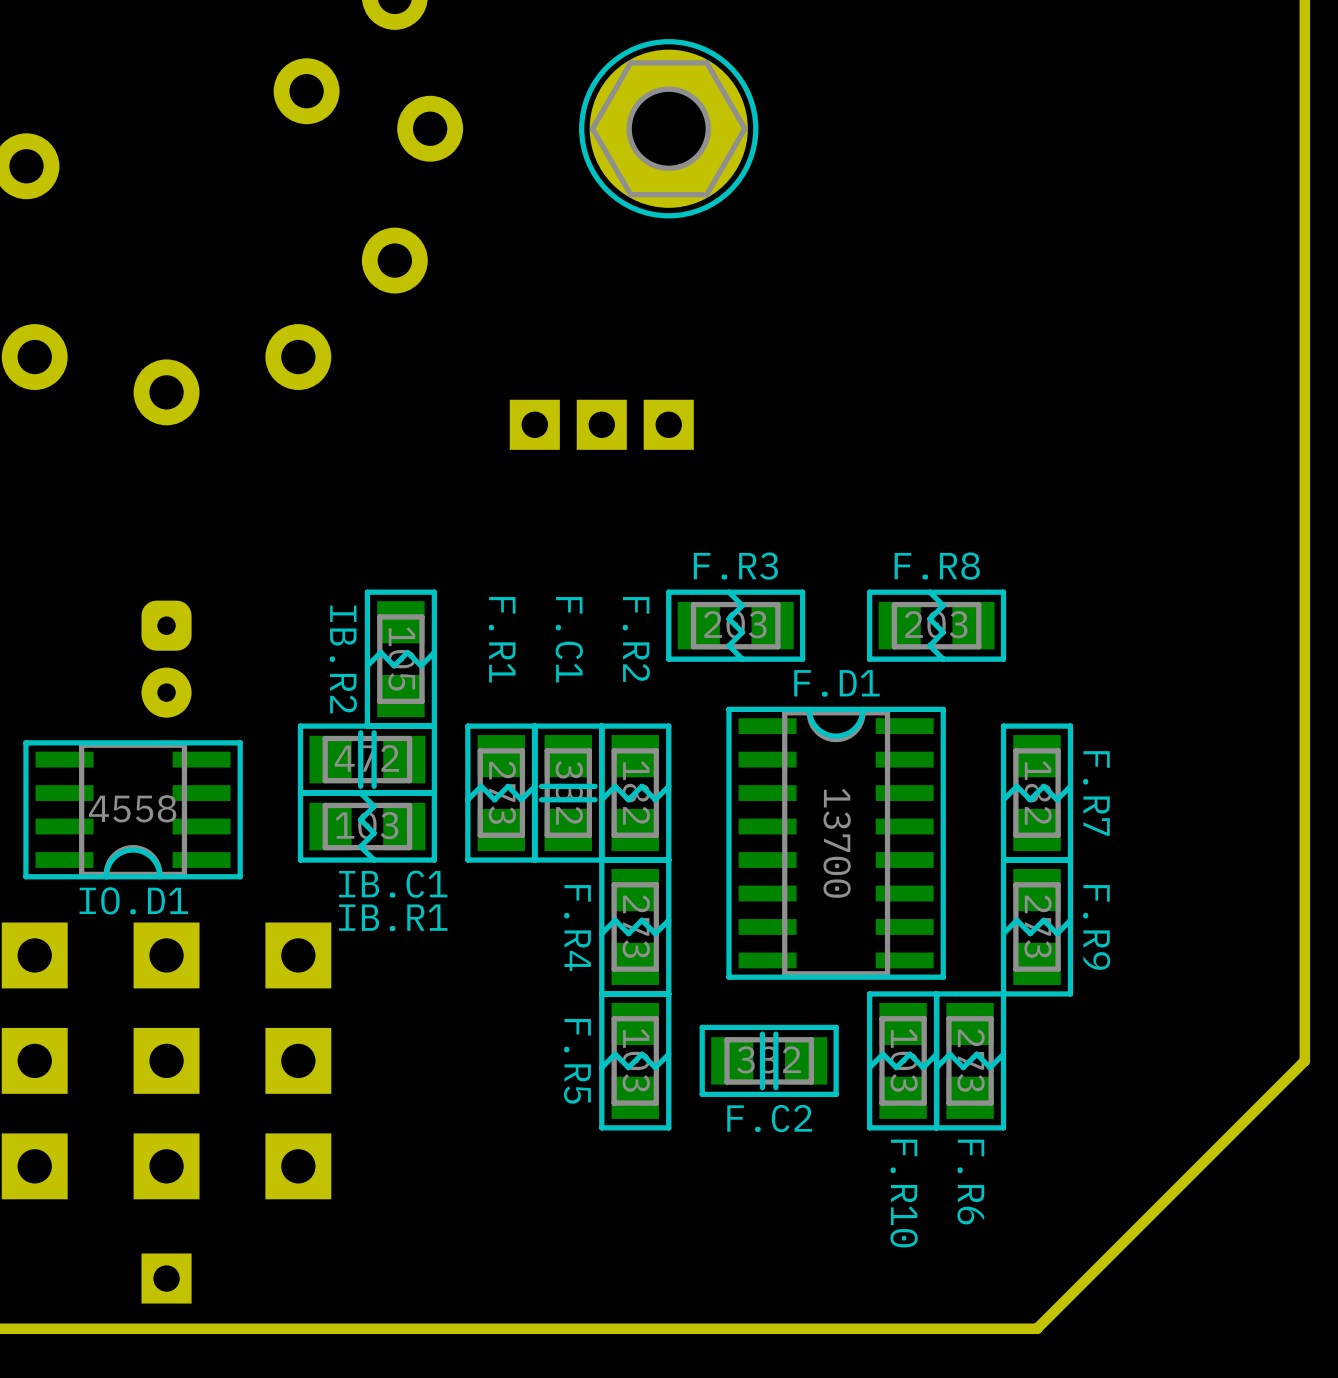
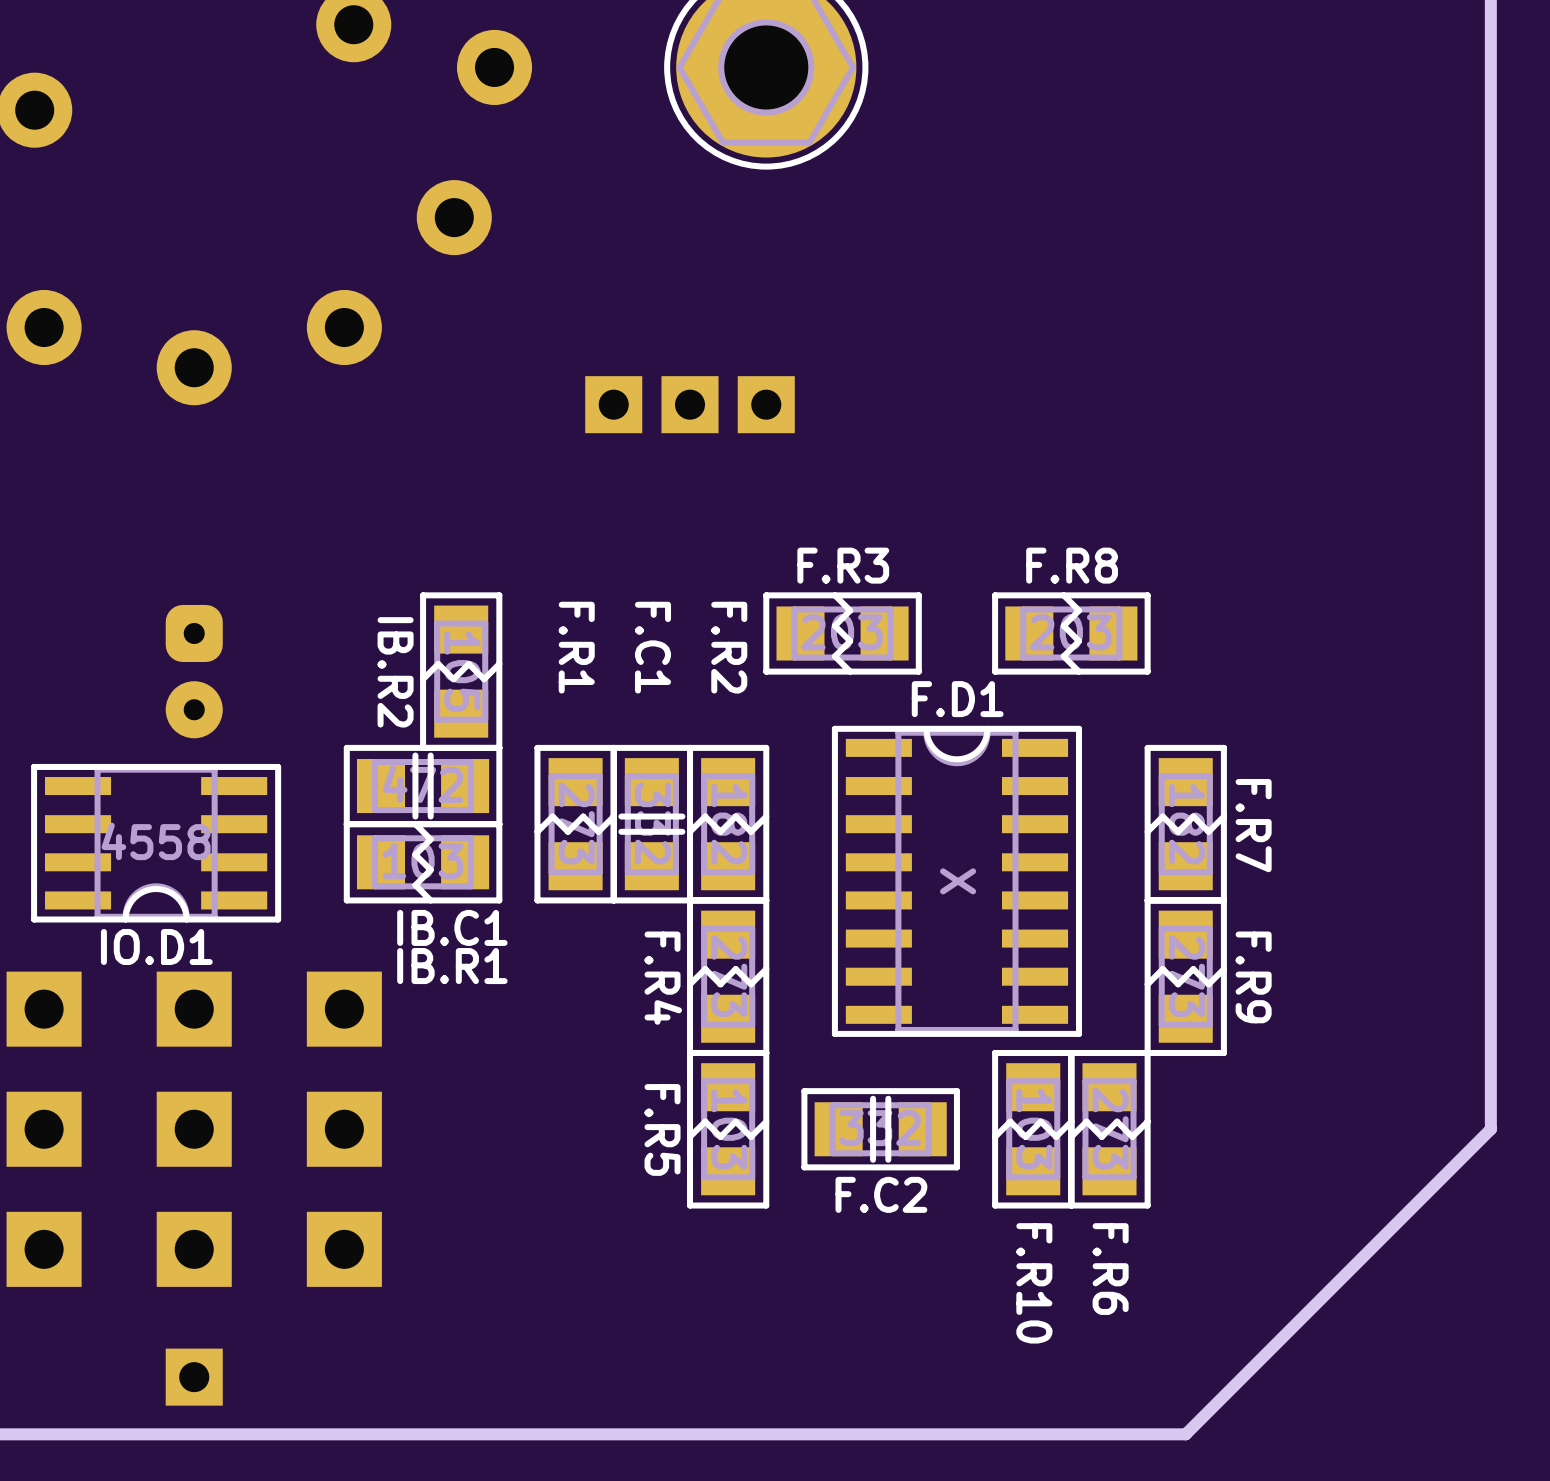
F.D1 value: 13700 (837, 843) -> X (958, 881)

